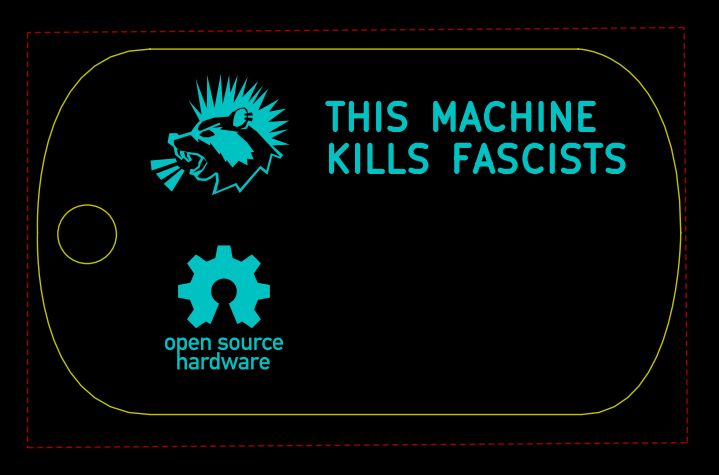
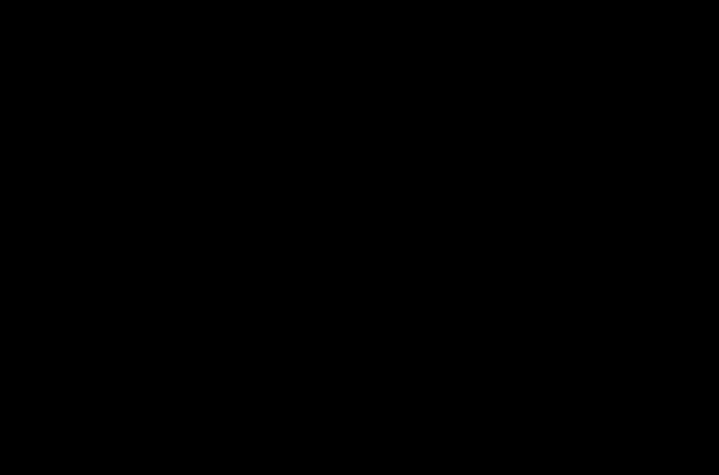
top zone outline: (684, 27) (687, 442) (27, 447) (27, 32) (684, 27) -> none
board edge: (149, 49) (578, 49) (602, 54) (619, 64) (639, 81) (656, 108) (671, 147) (679, 200) (680, 240) (675, 290) (663, 340) (648, 372) (627, 397) (614, 406) (599, 412) (581, 414) (149, 414) (128, 412) (110, 406) (94, 397) (81, 386) (61, 356) (54, 340) (44, 306) (37, 249) (38, 203) (41, 174) (54, 123) (70, 91) (81, 77) (94, 66) (110, 56) (128, 51) (149, 49) -> none
drawing: [150, 73, 290, 196] -> none
text: THIS MACHINE (460, 116) -> none
text: KILLS FASCISTS (477, 158) -> none
round board edge: [57, 204, 117, 264] -> none
drawing: [164, 245, 284, 370] -> none

